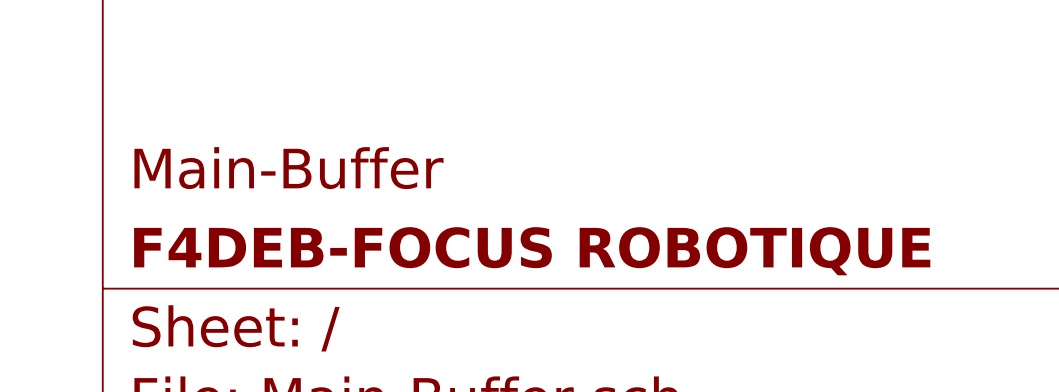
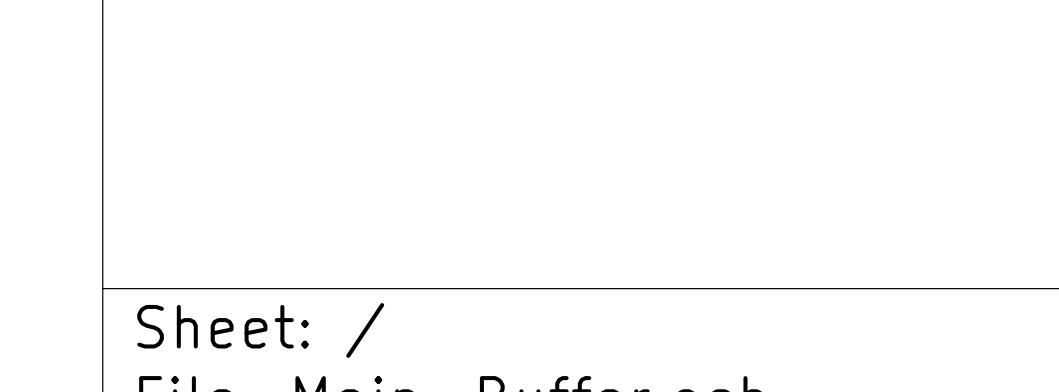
title block: Main-Buffer (288, 168) -> none
title block: F4DEB-FOCUS ROBOTIQUE (532, 251) -> none

